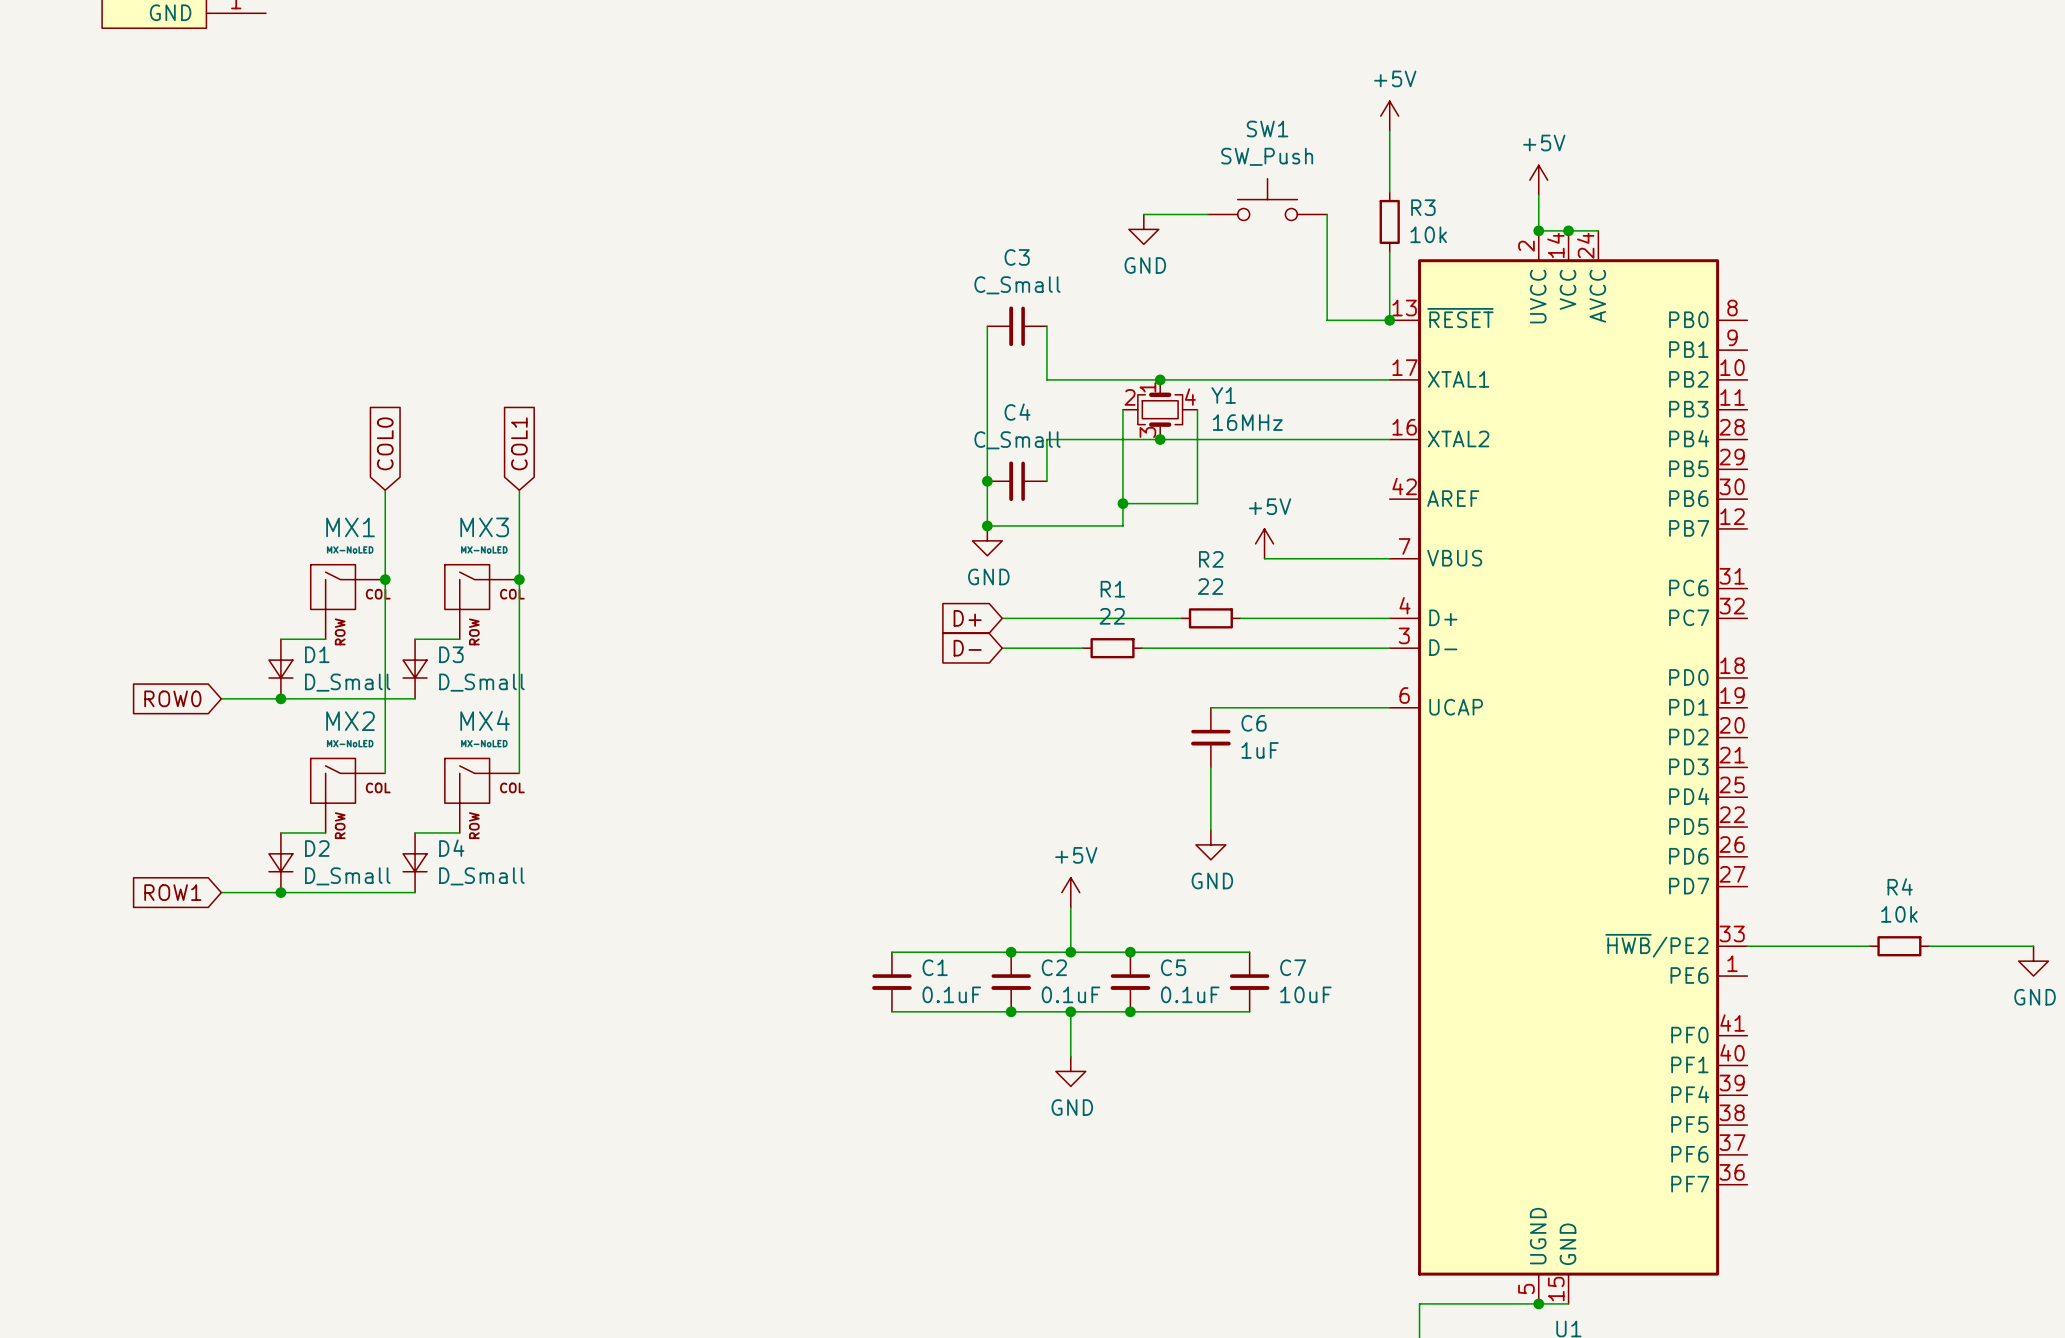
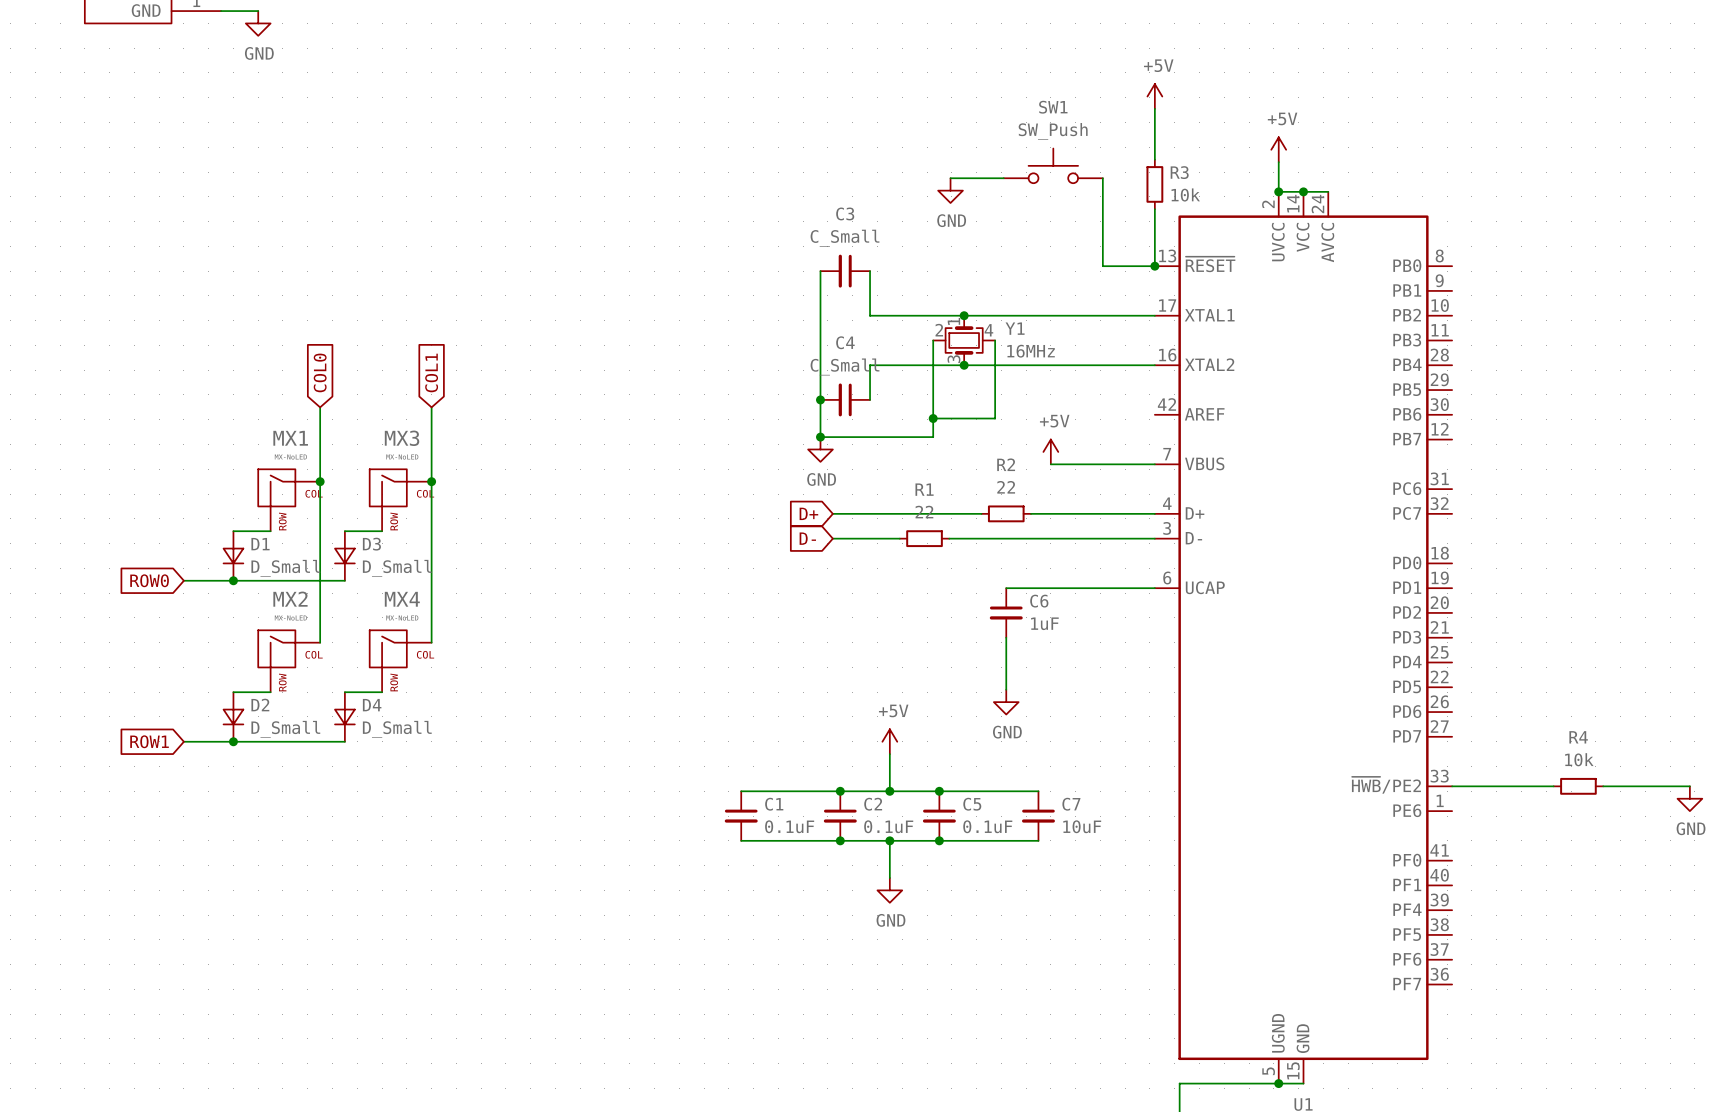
wire: none -> (221, 11) (258, 11)
power symbol: none -> GND (258, 23)

